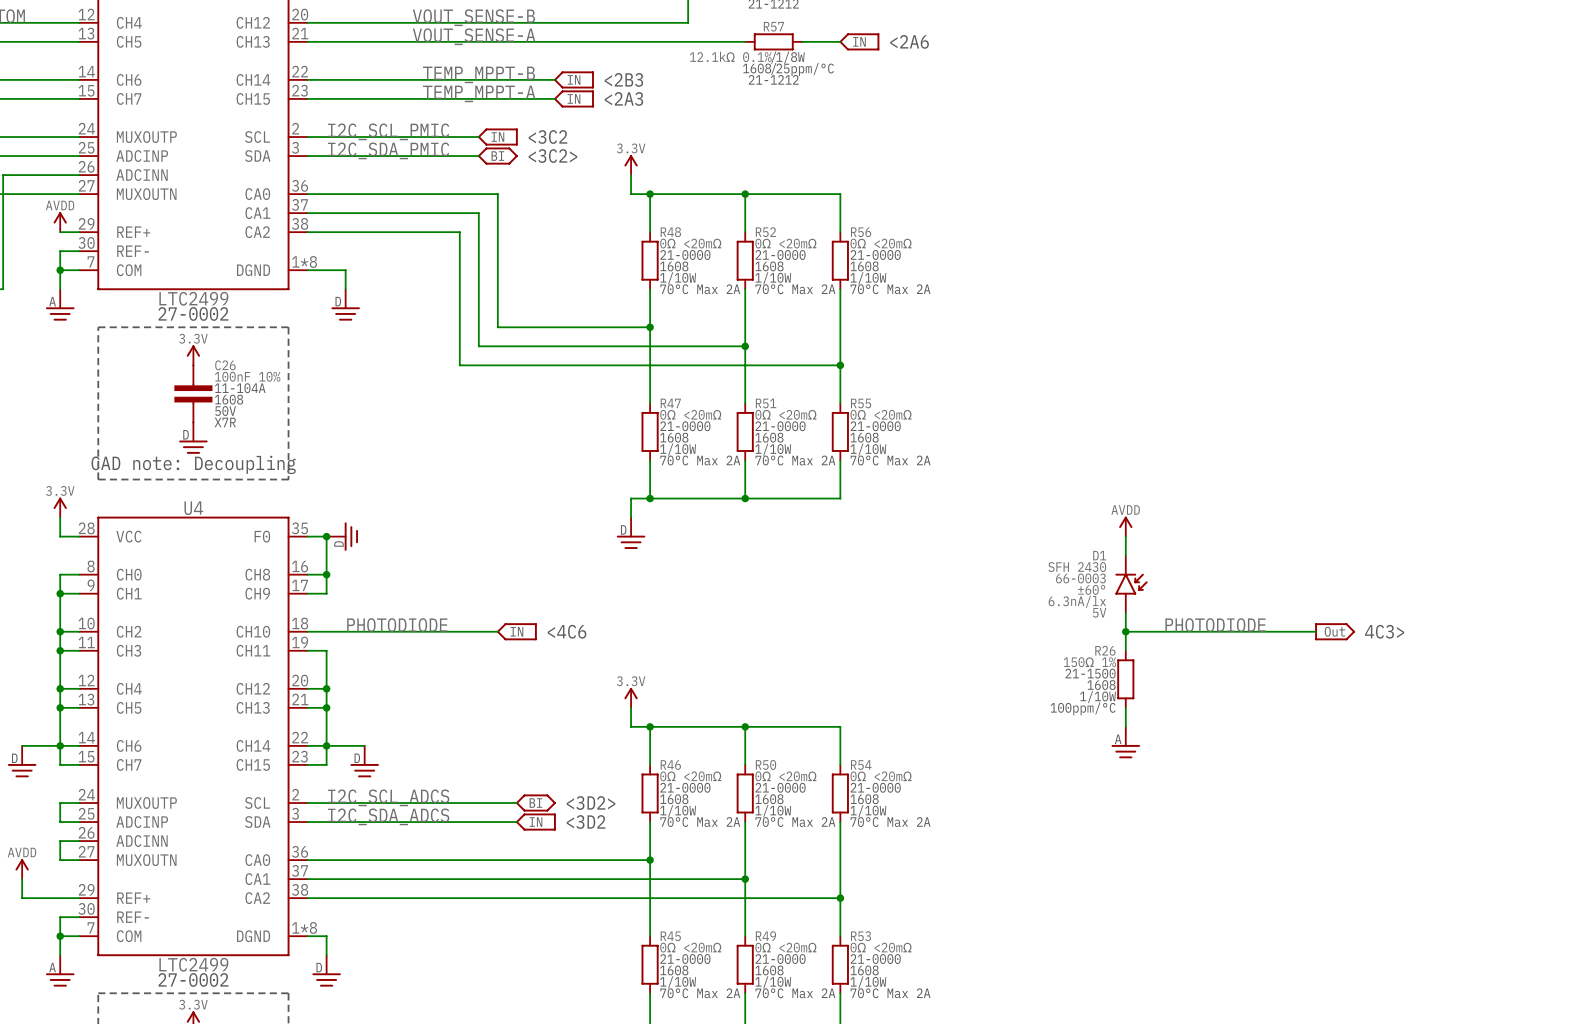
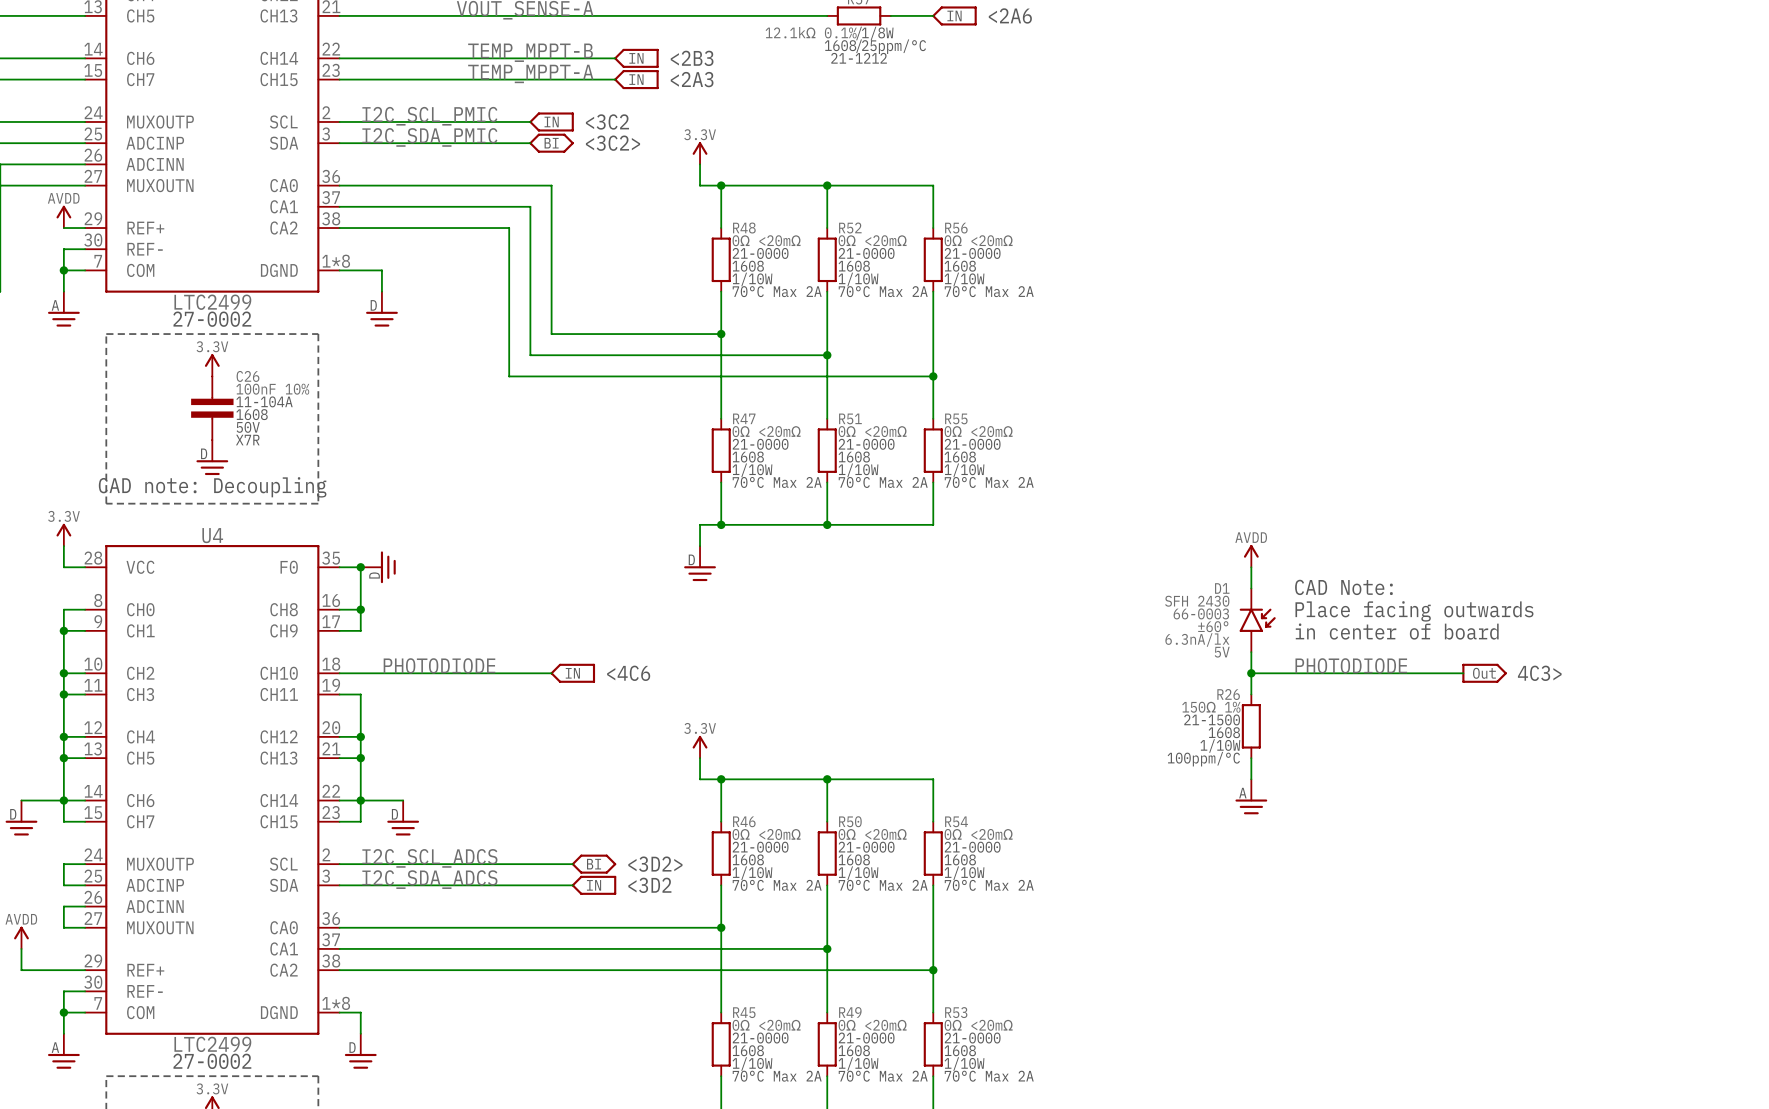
text: none -> CAD Note: (1343, 587)
text: none -> Place facing outwards (1414, 611)
text: none -> in center of board (1397, 631)

